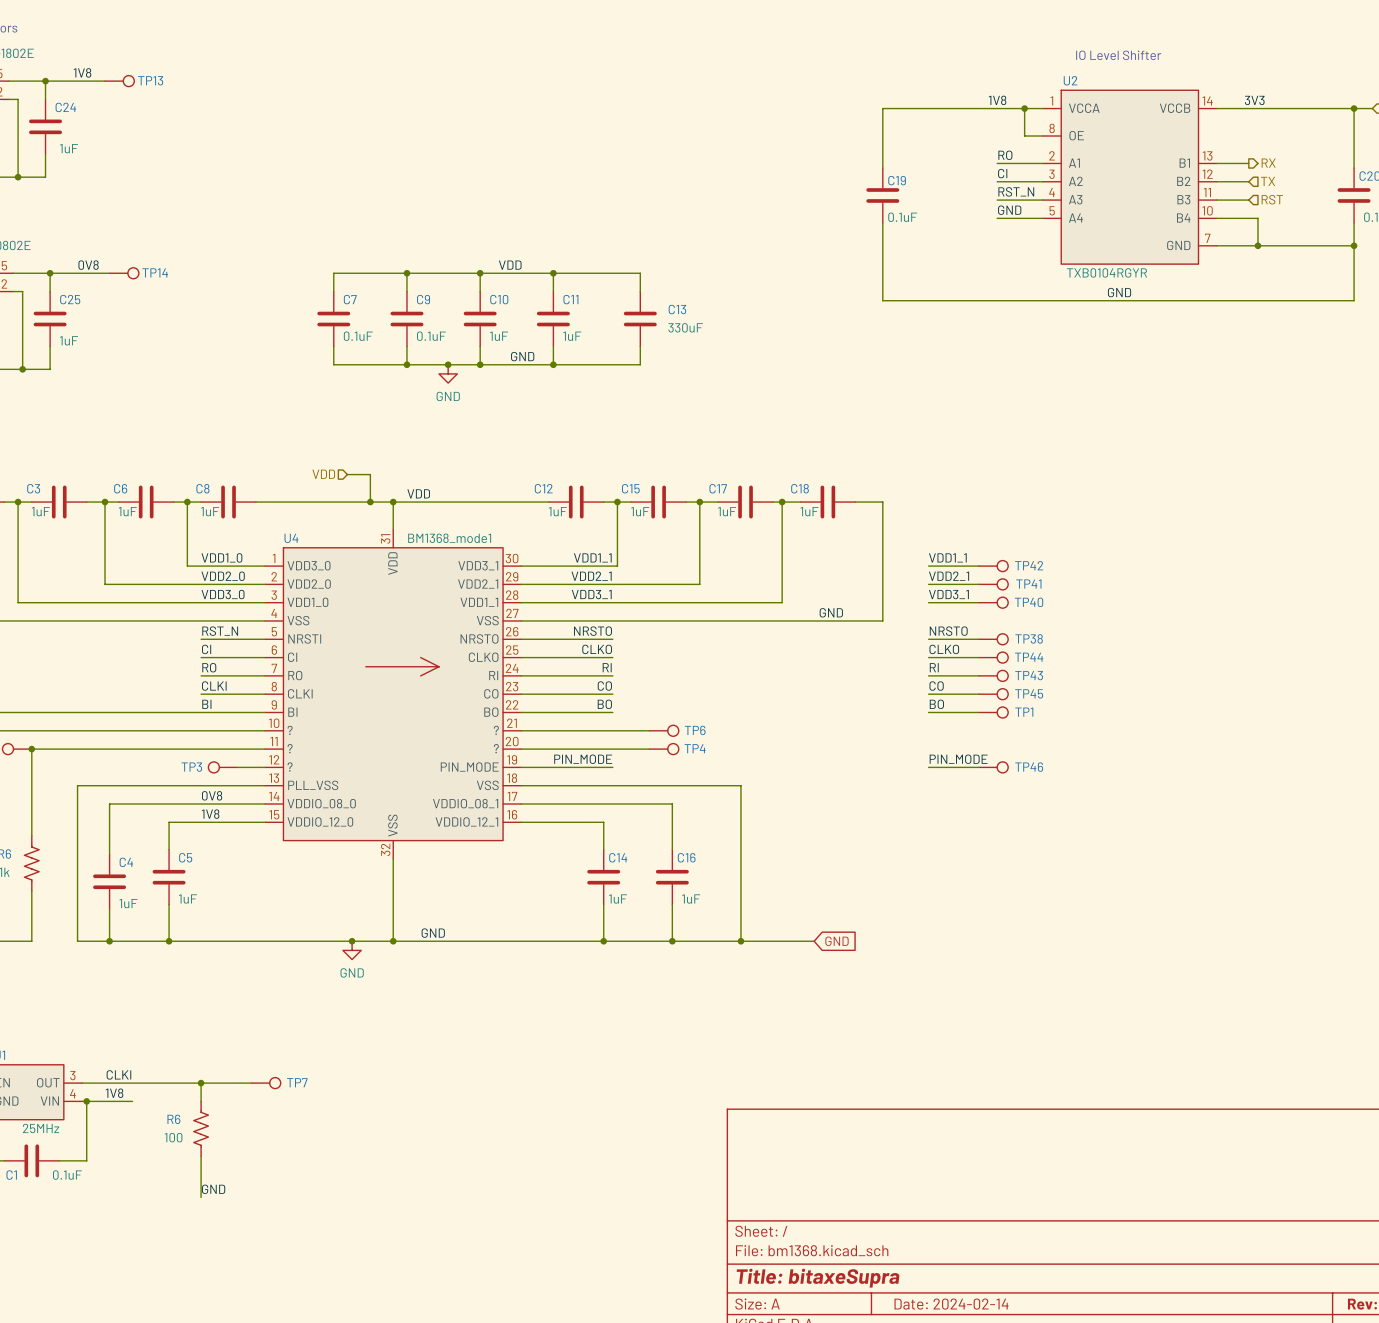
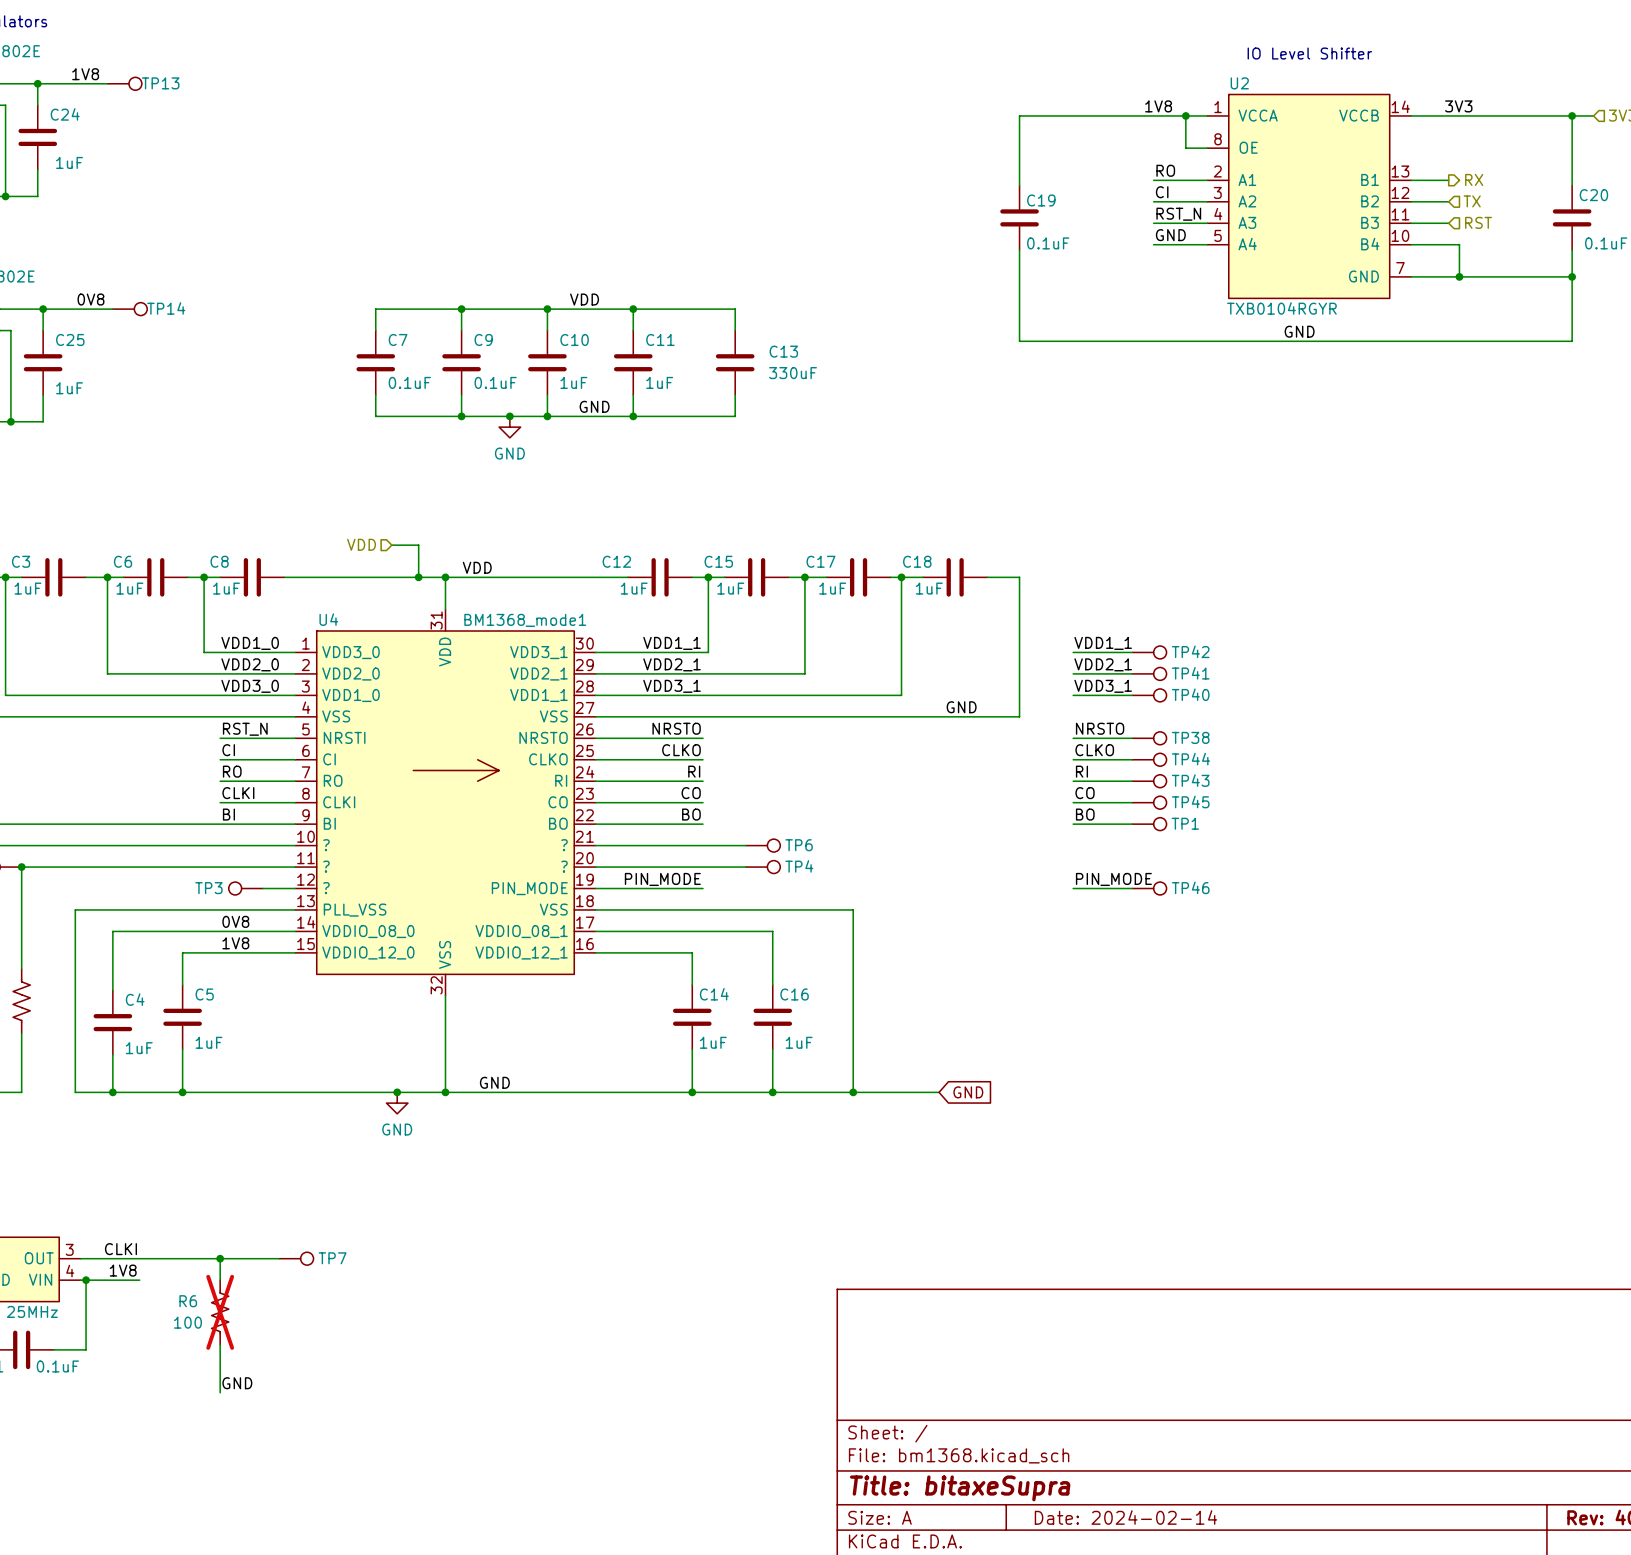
R6 do-not-place cross: none -> (220, 1312)

